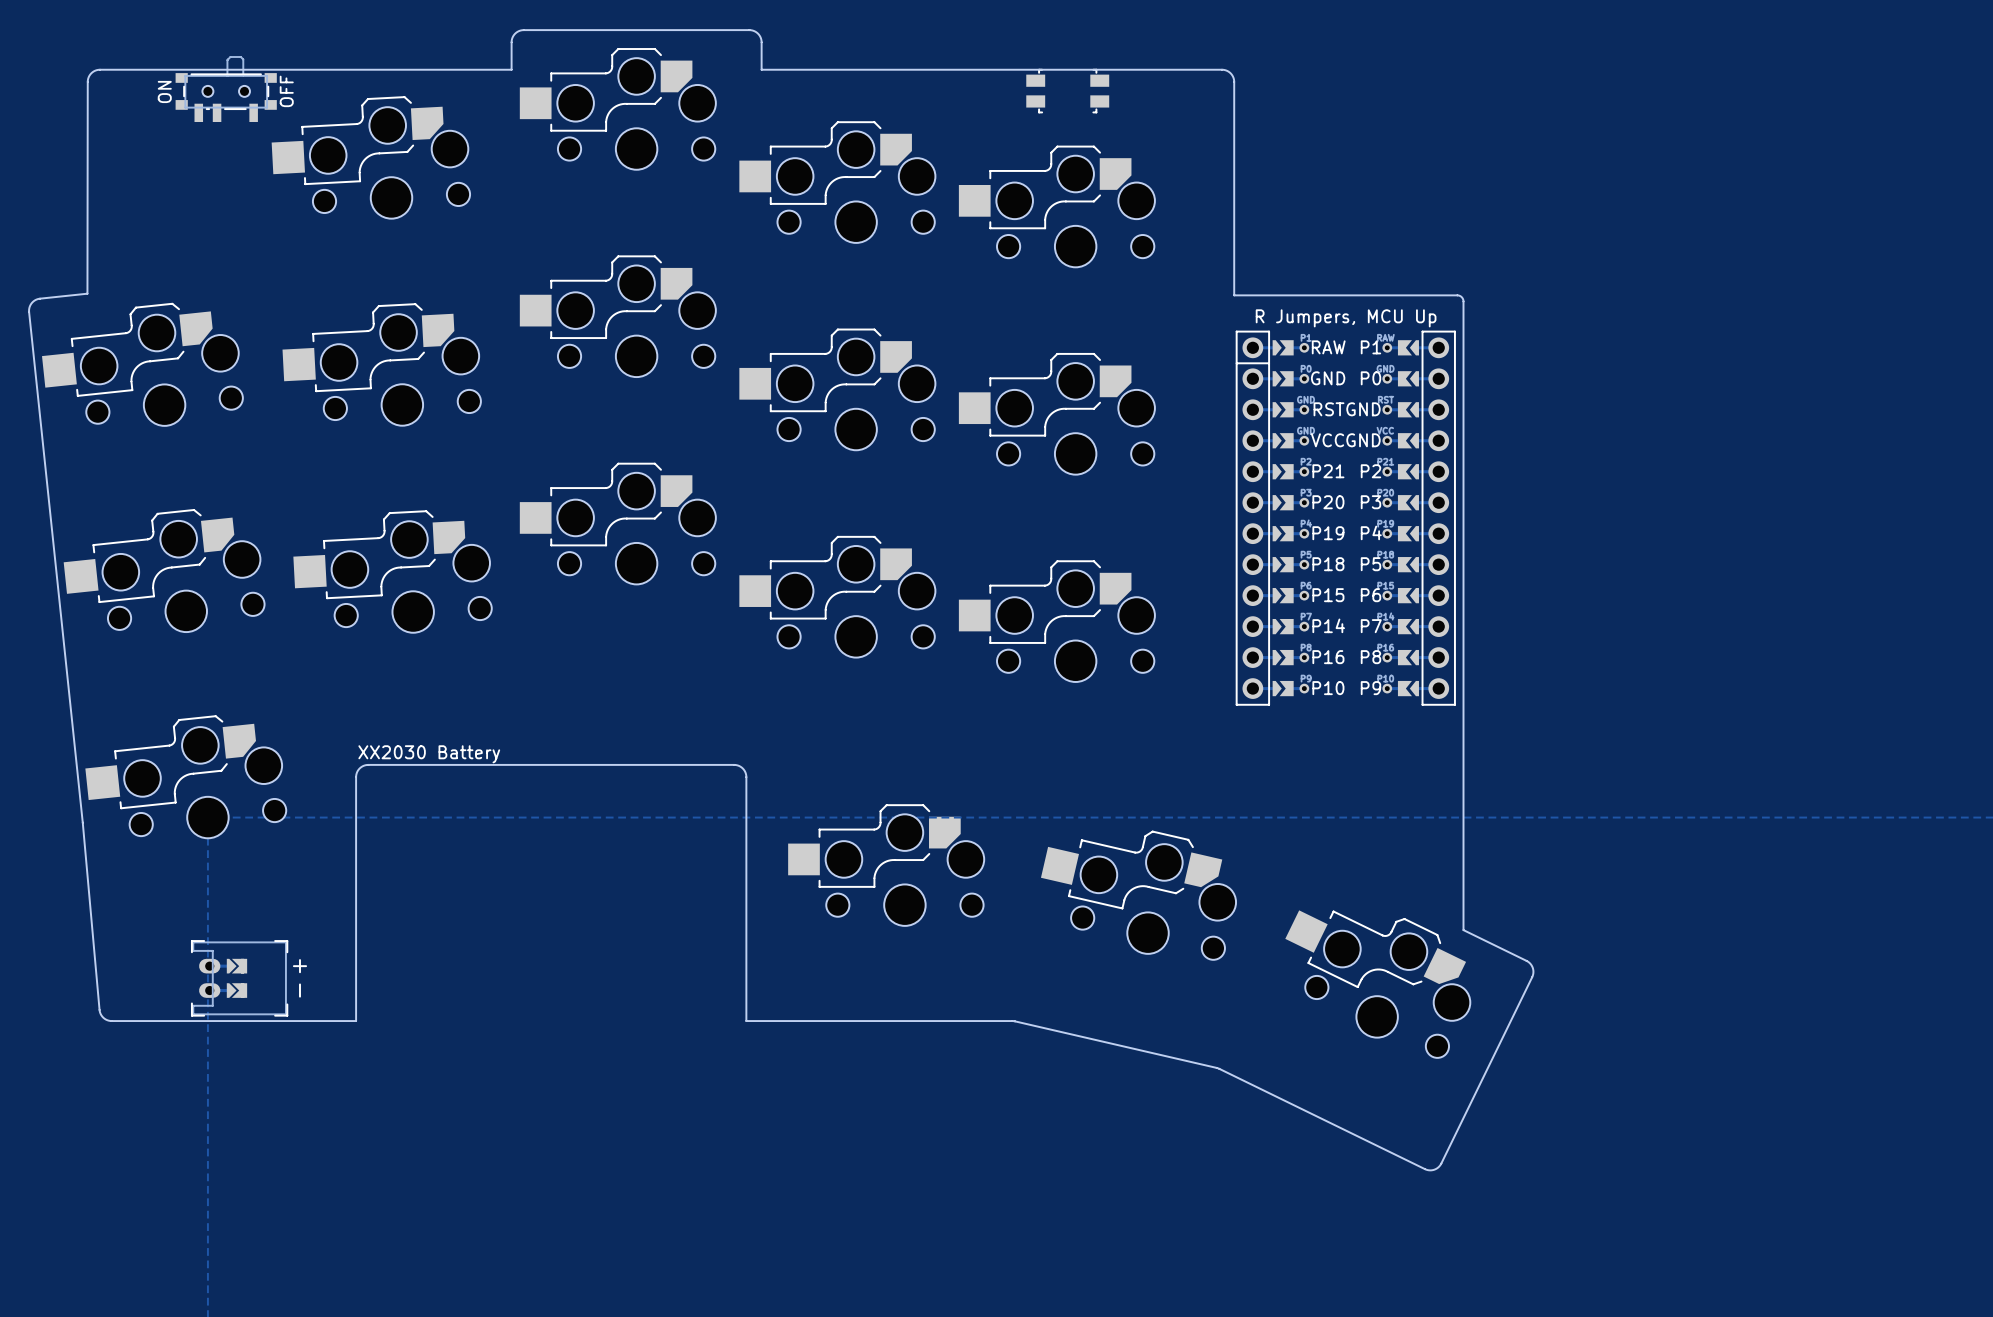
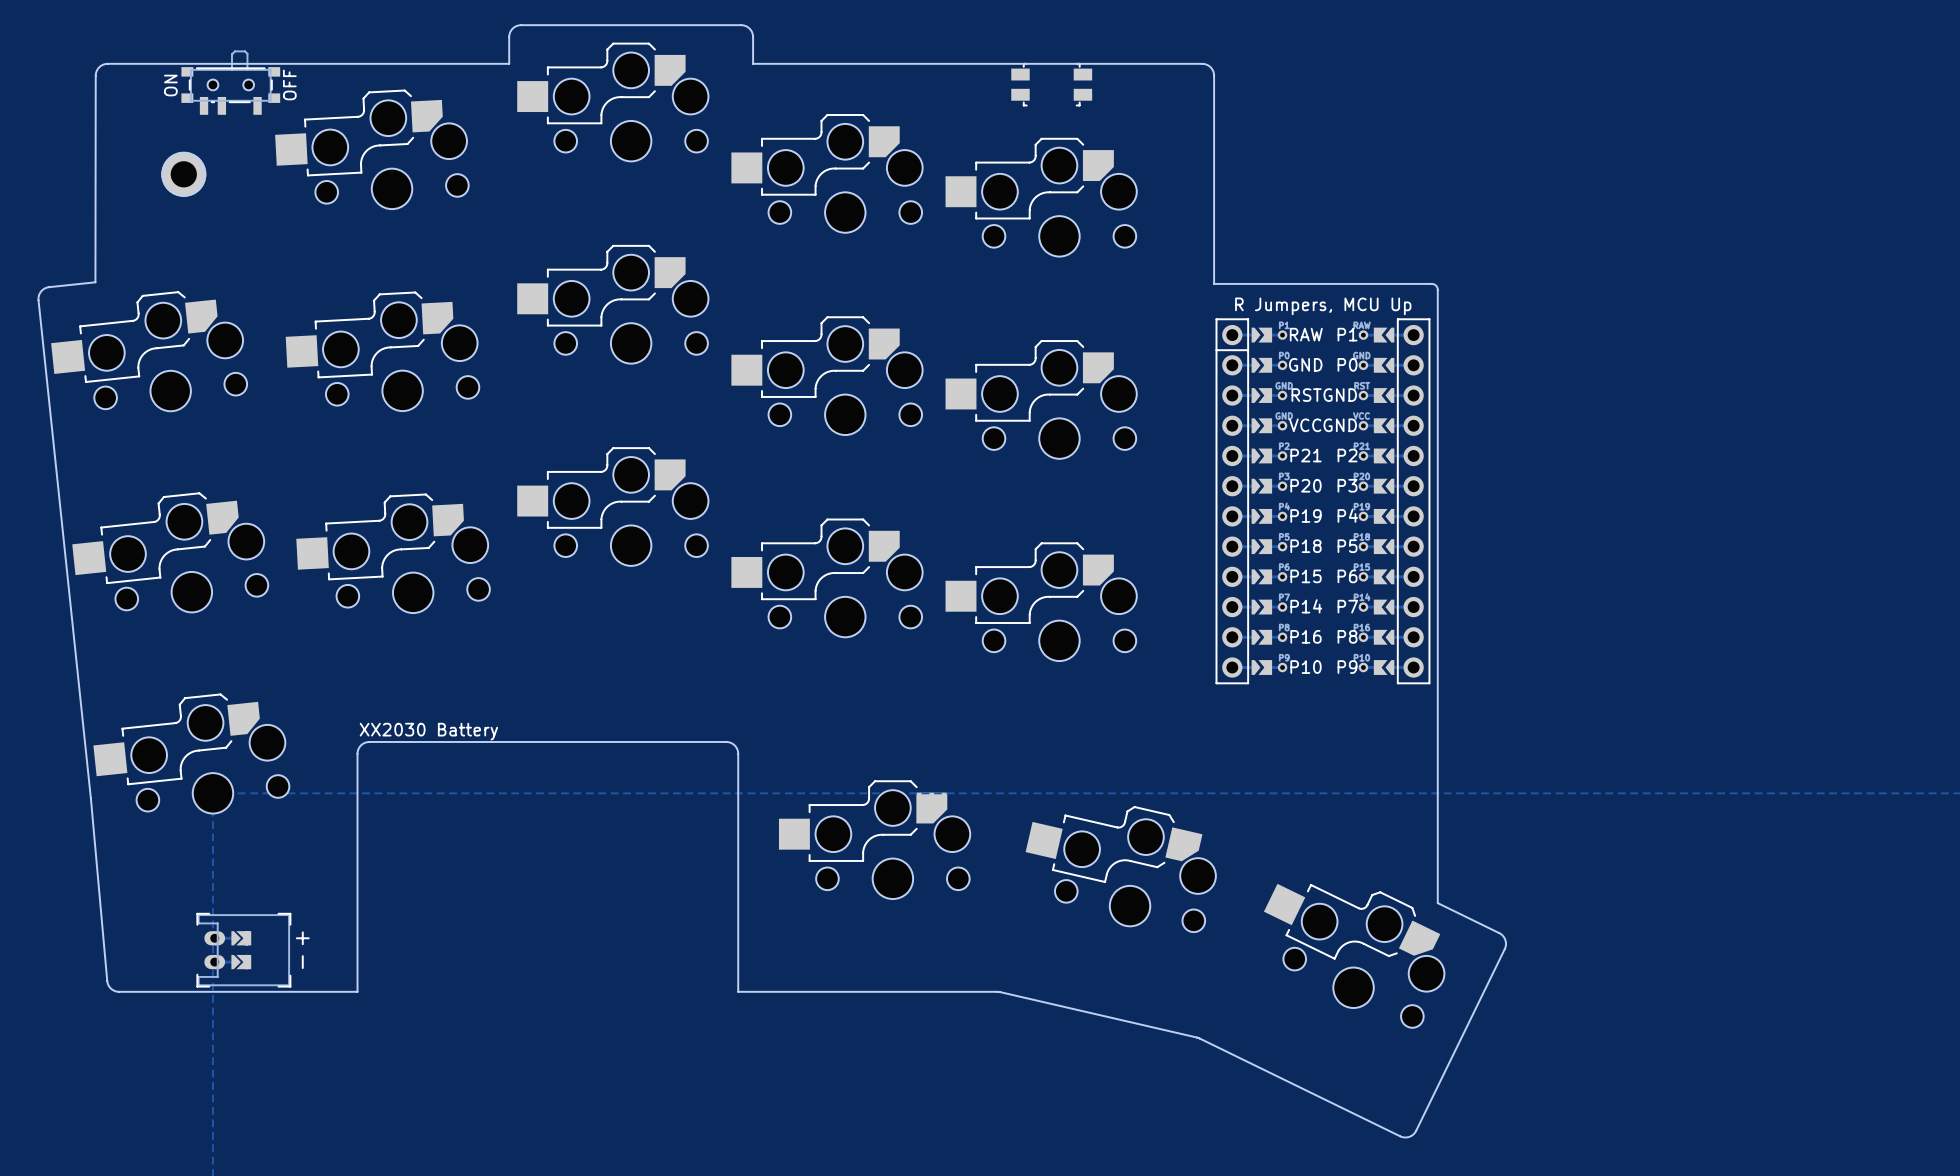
part: none -> (183, 174)

